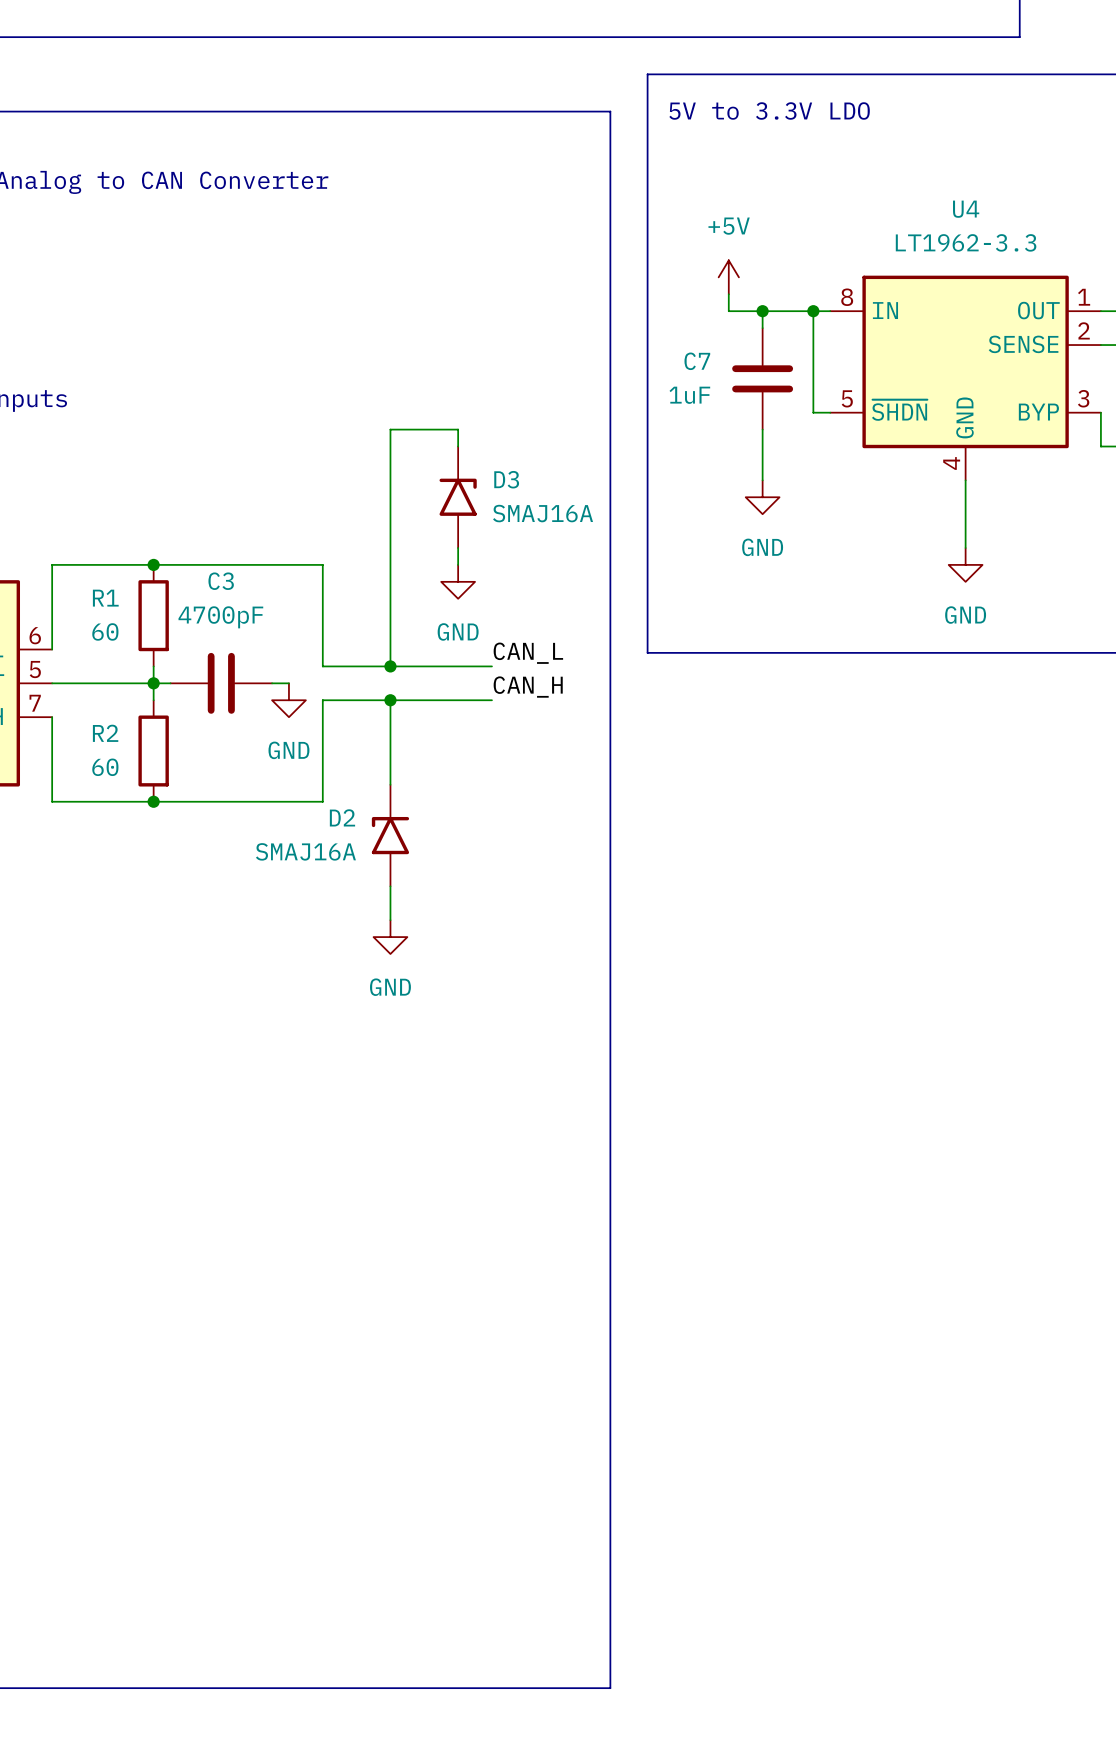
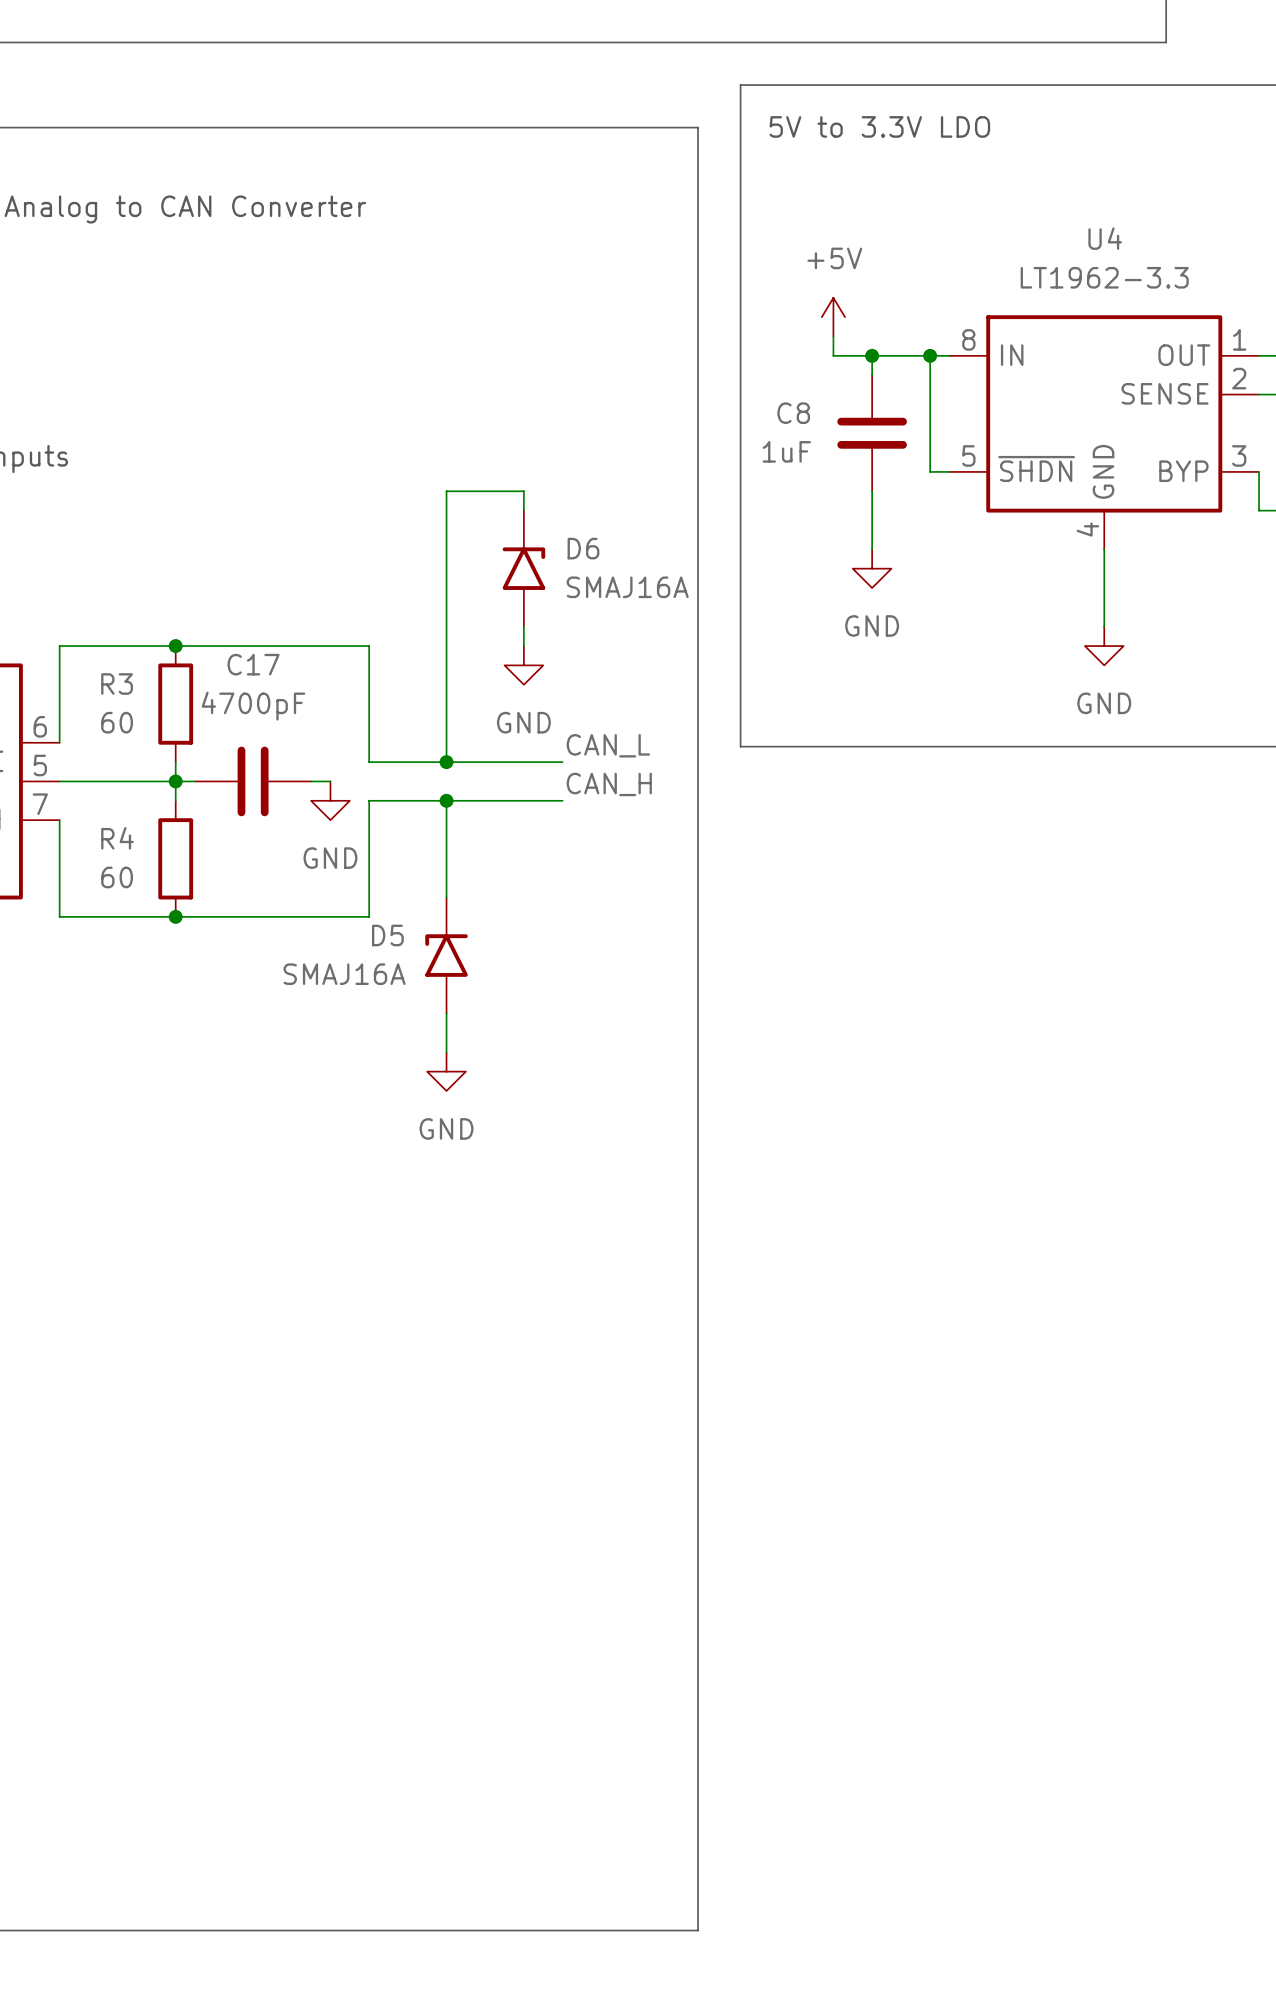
C7 name: C7 (697, 361) -> C8 (793, 413)
D3 name: D3 (506, 479) -> D6 (583, 548)
C3 name: C3 (221, 581) -> C17 (253, 664)
R1 name: R1 (105, 598) -> R3 (117, 684)
R2 name: R2 (105, 733) -> R4 (117, 838)
D2 name: D2 (342, 817) -> D5 (387, 935)

